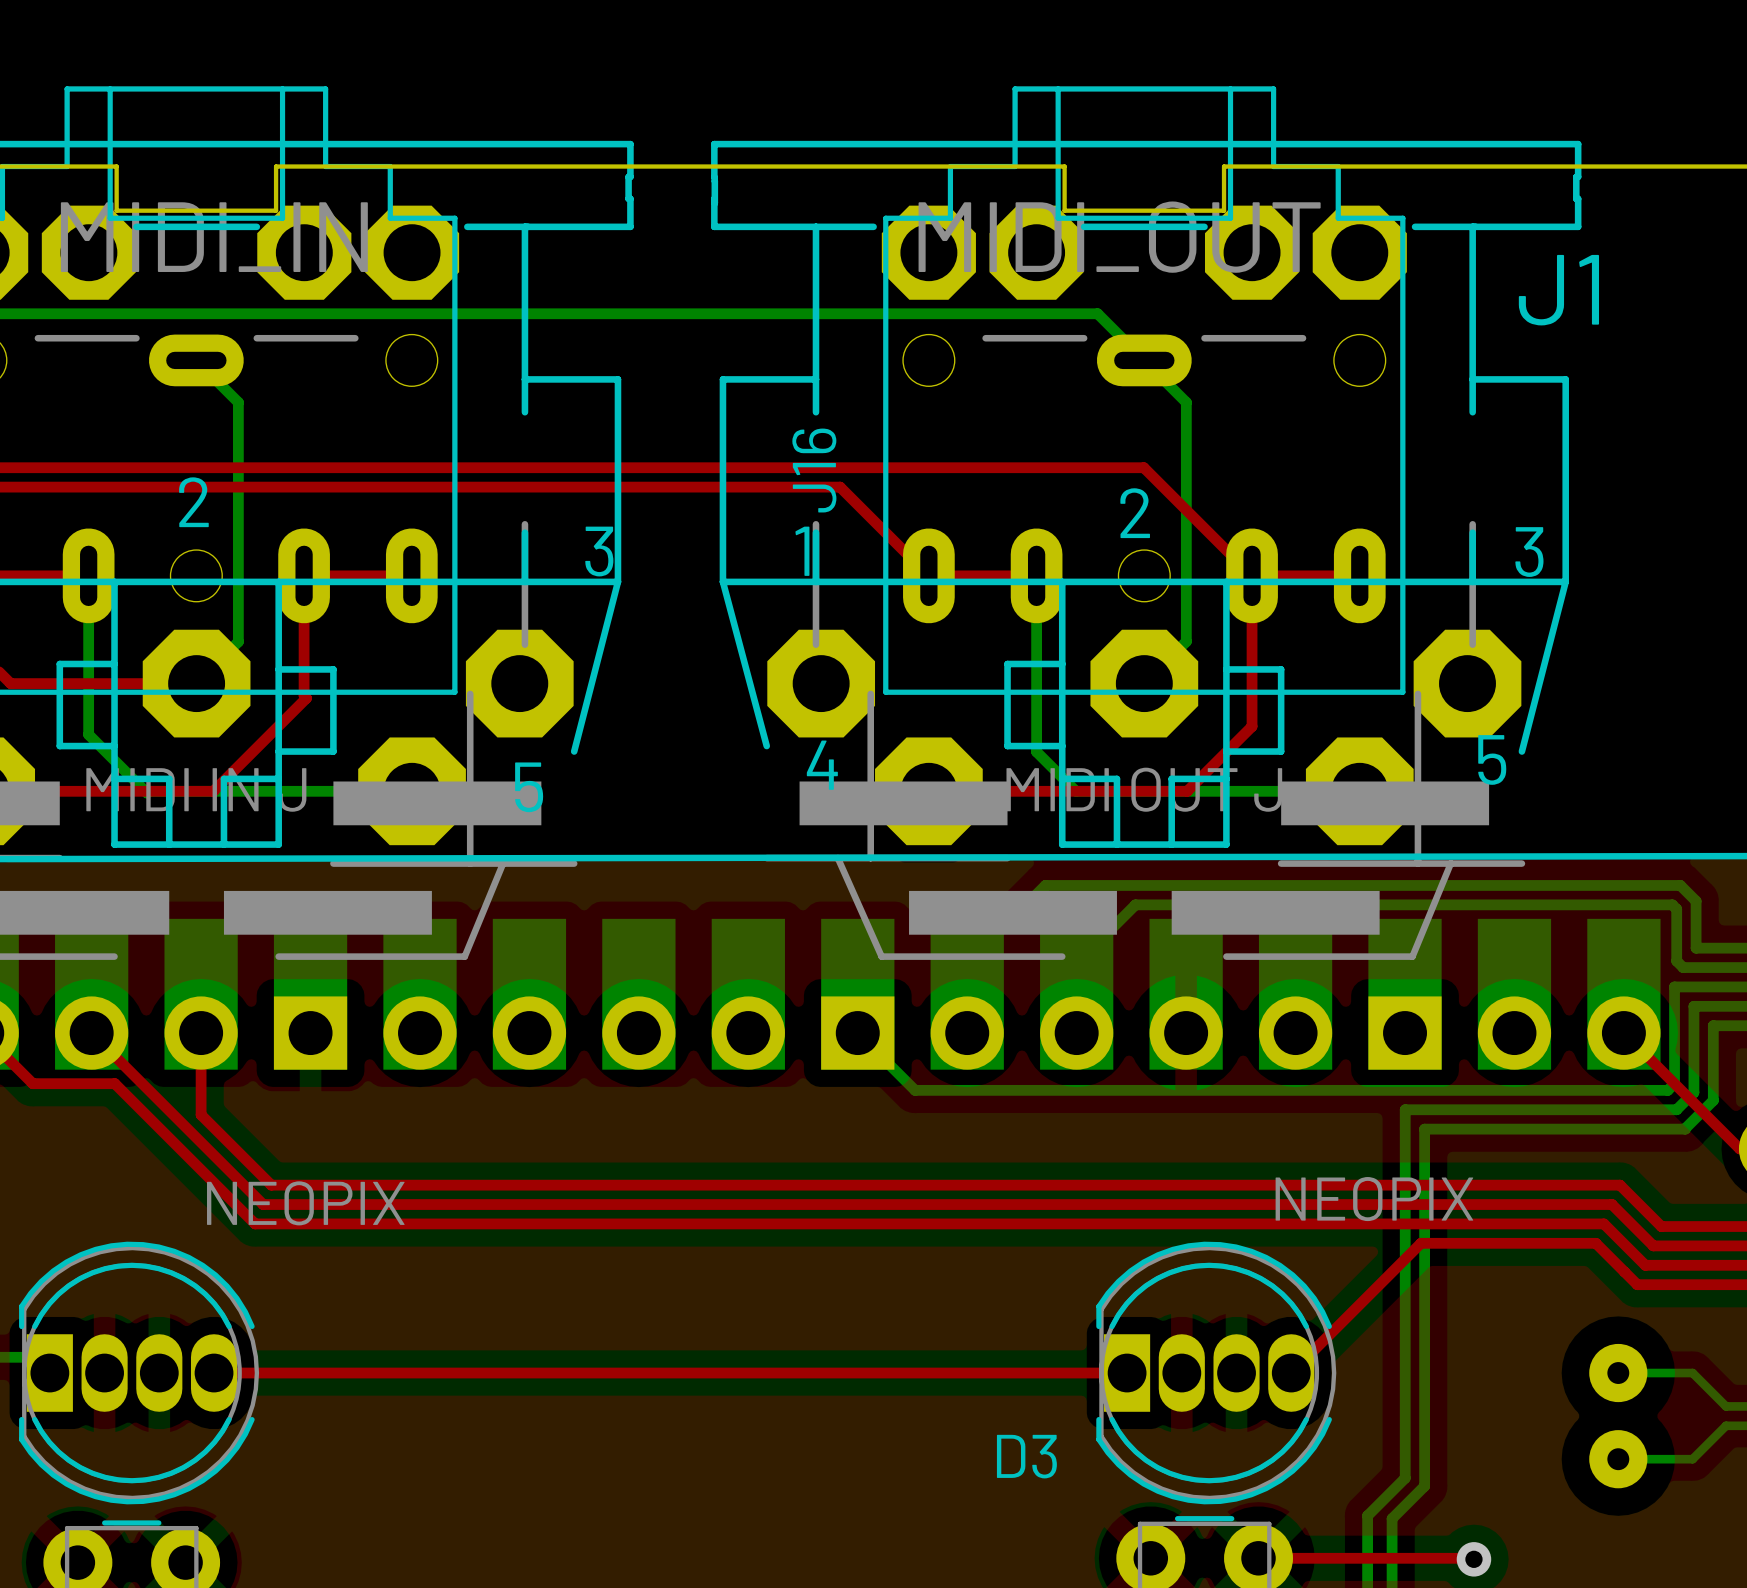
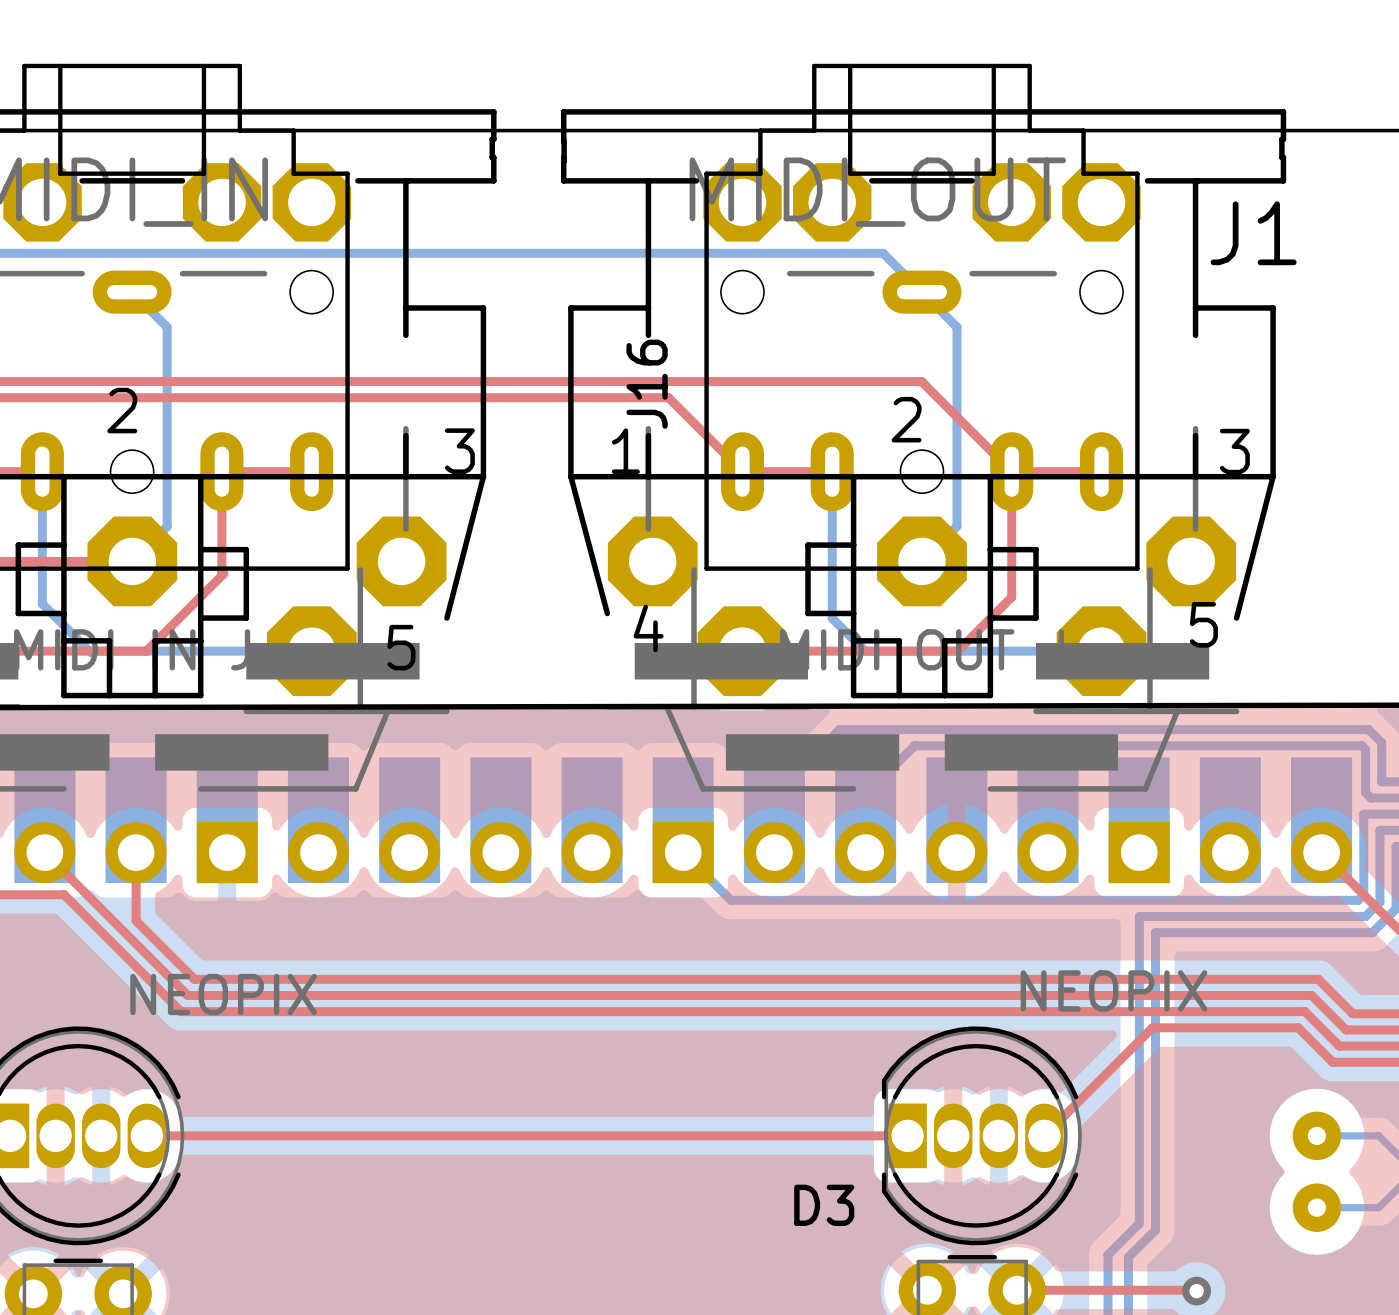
board edge: (116, 166) (116, 210) (276, 210) (276, 166) -> (65, 130) (198, 130)
board edge: (1064, 166) (1064, 210) (1224, 210) (1224, 166) -> (855, 130) (988, 130)

